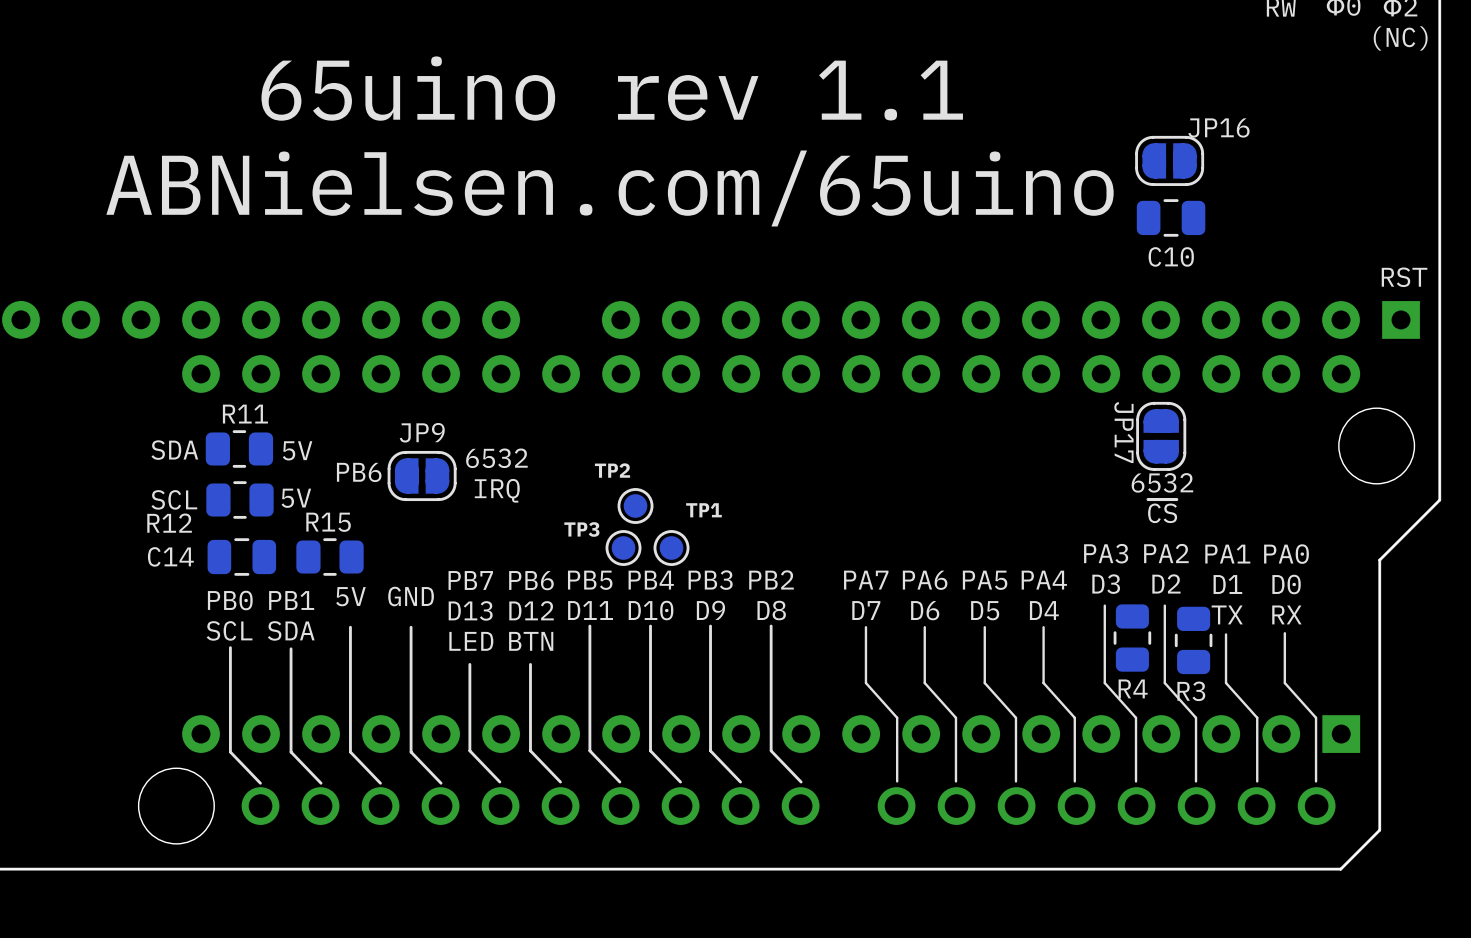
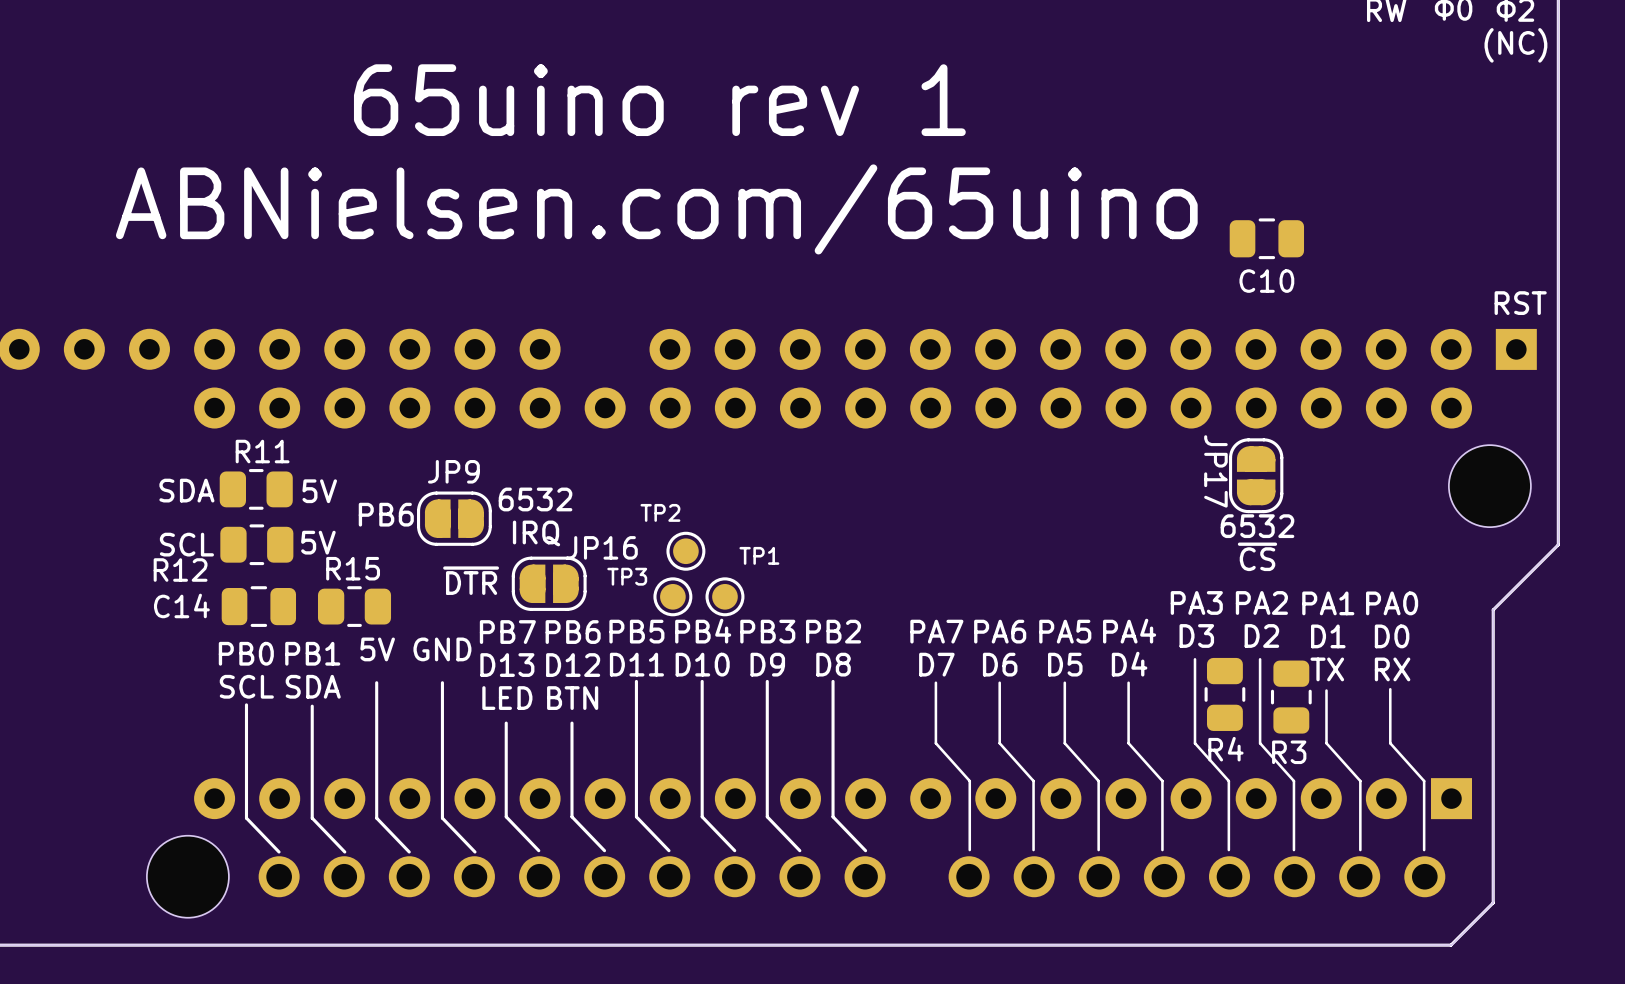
text: 65uino rev 1.1 (612, 88) -> 65uino rev 1 (659, 100)
JP16 position: (1169, 160) -> (549, 583)
text: none -> ~{DTR} (471, 580)

